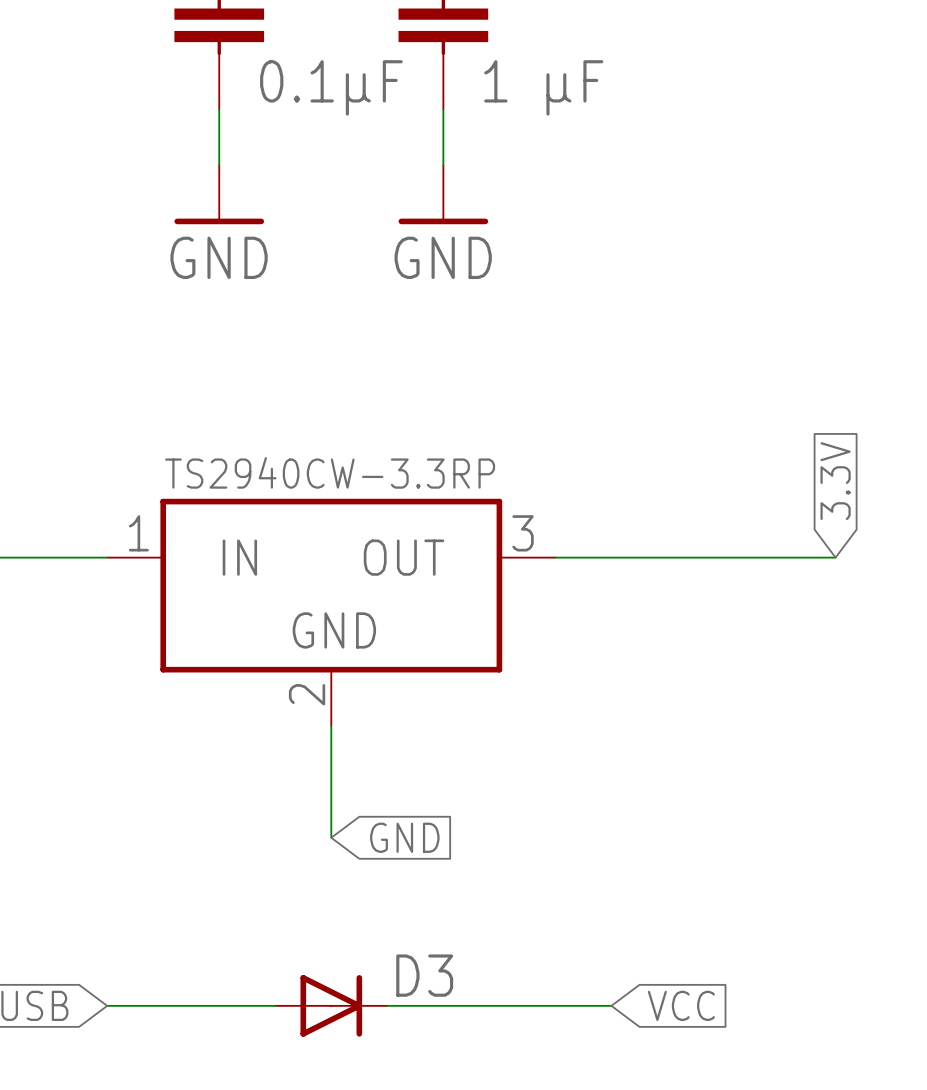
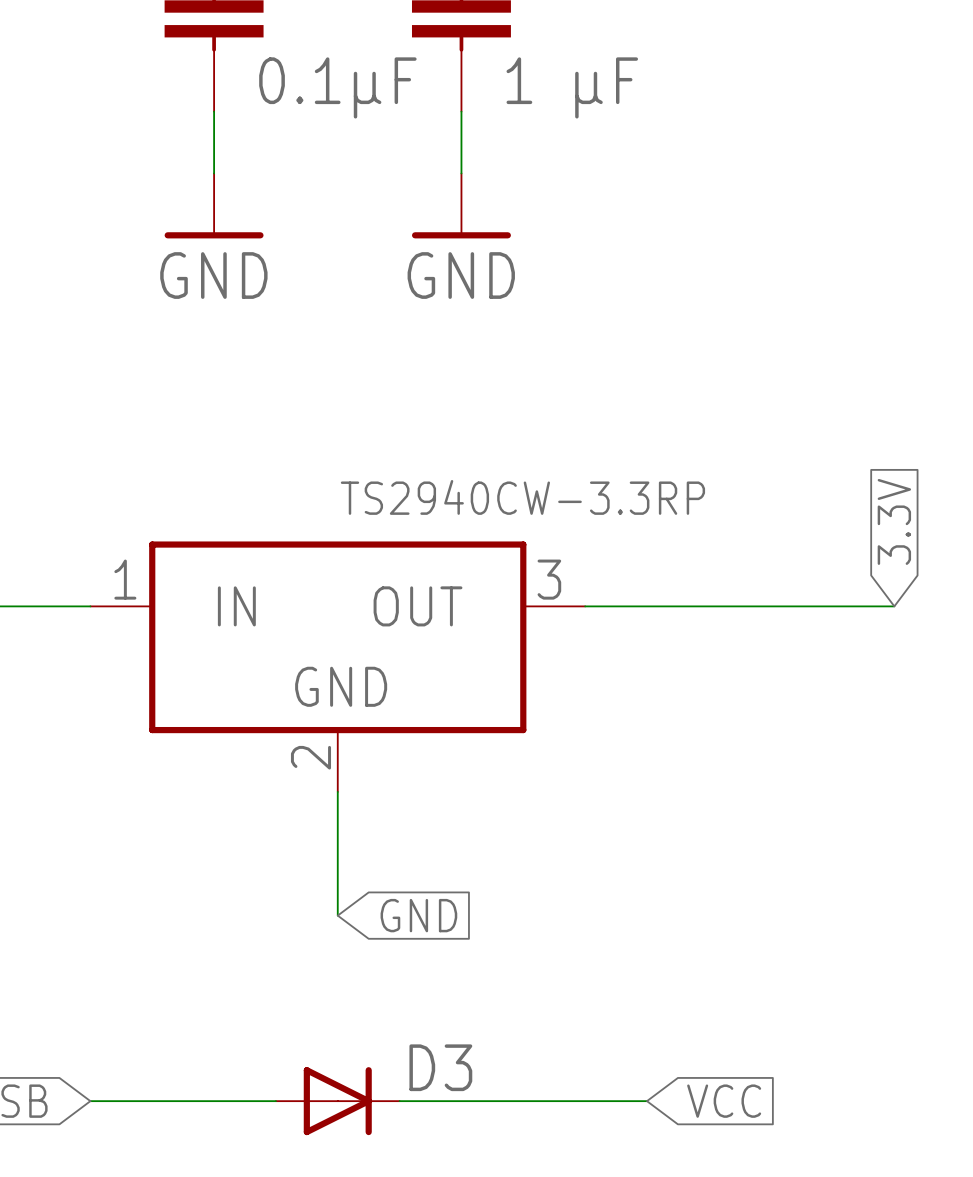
part value position: TS2940CW-3.3RP (330, 472) -> TS2940CW-3.3RP (522, 497)

